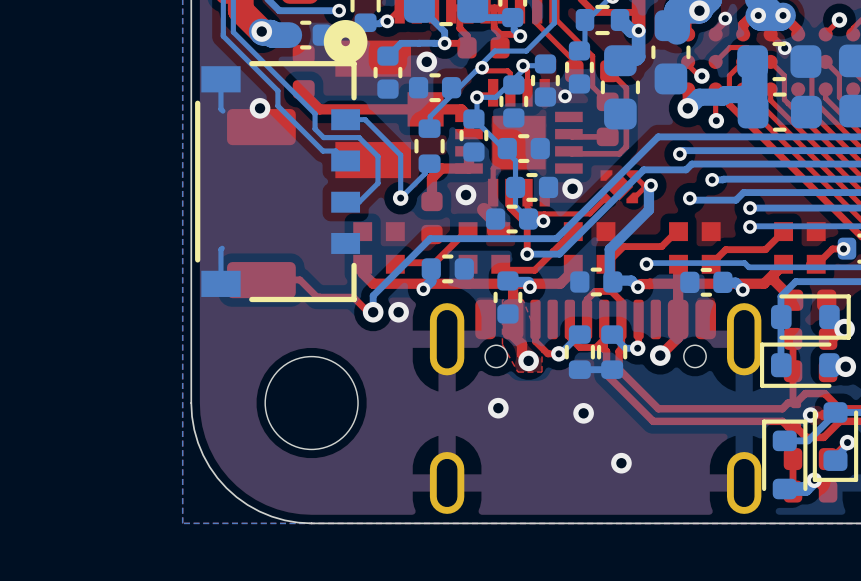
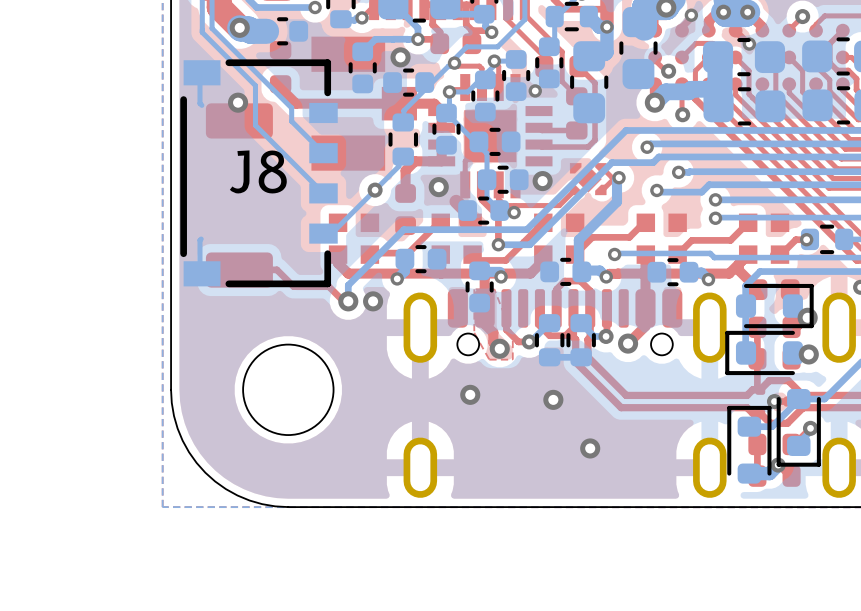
bottom track: (277, 105) (322, 151) (335, 151) (345, 160) -> (255, 100) (255, 125) (323, 193)
bottom track: (345, 119) (365, 119) (400, 155) (400, 198) -> (323, 233) (331, 233) (375, 190)
bottom track: (315, 127) (323, 137) (359, 137) (377, 156) (377, 183) (359, 202) (345, 202) -> (291, 121) (323, 153)
part: (281, 161) -> none
J8: none -> (274, 173)

